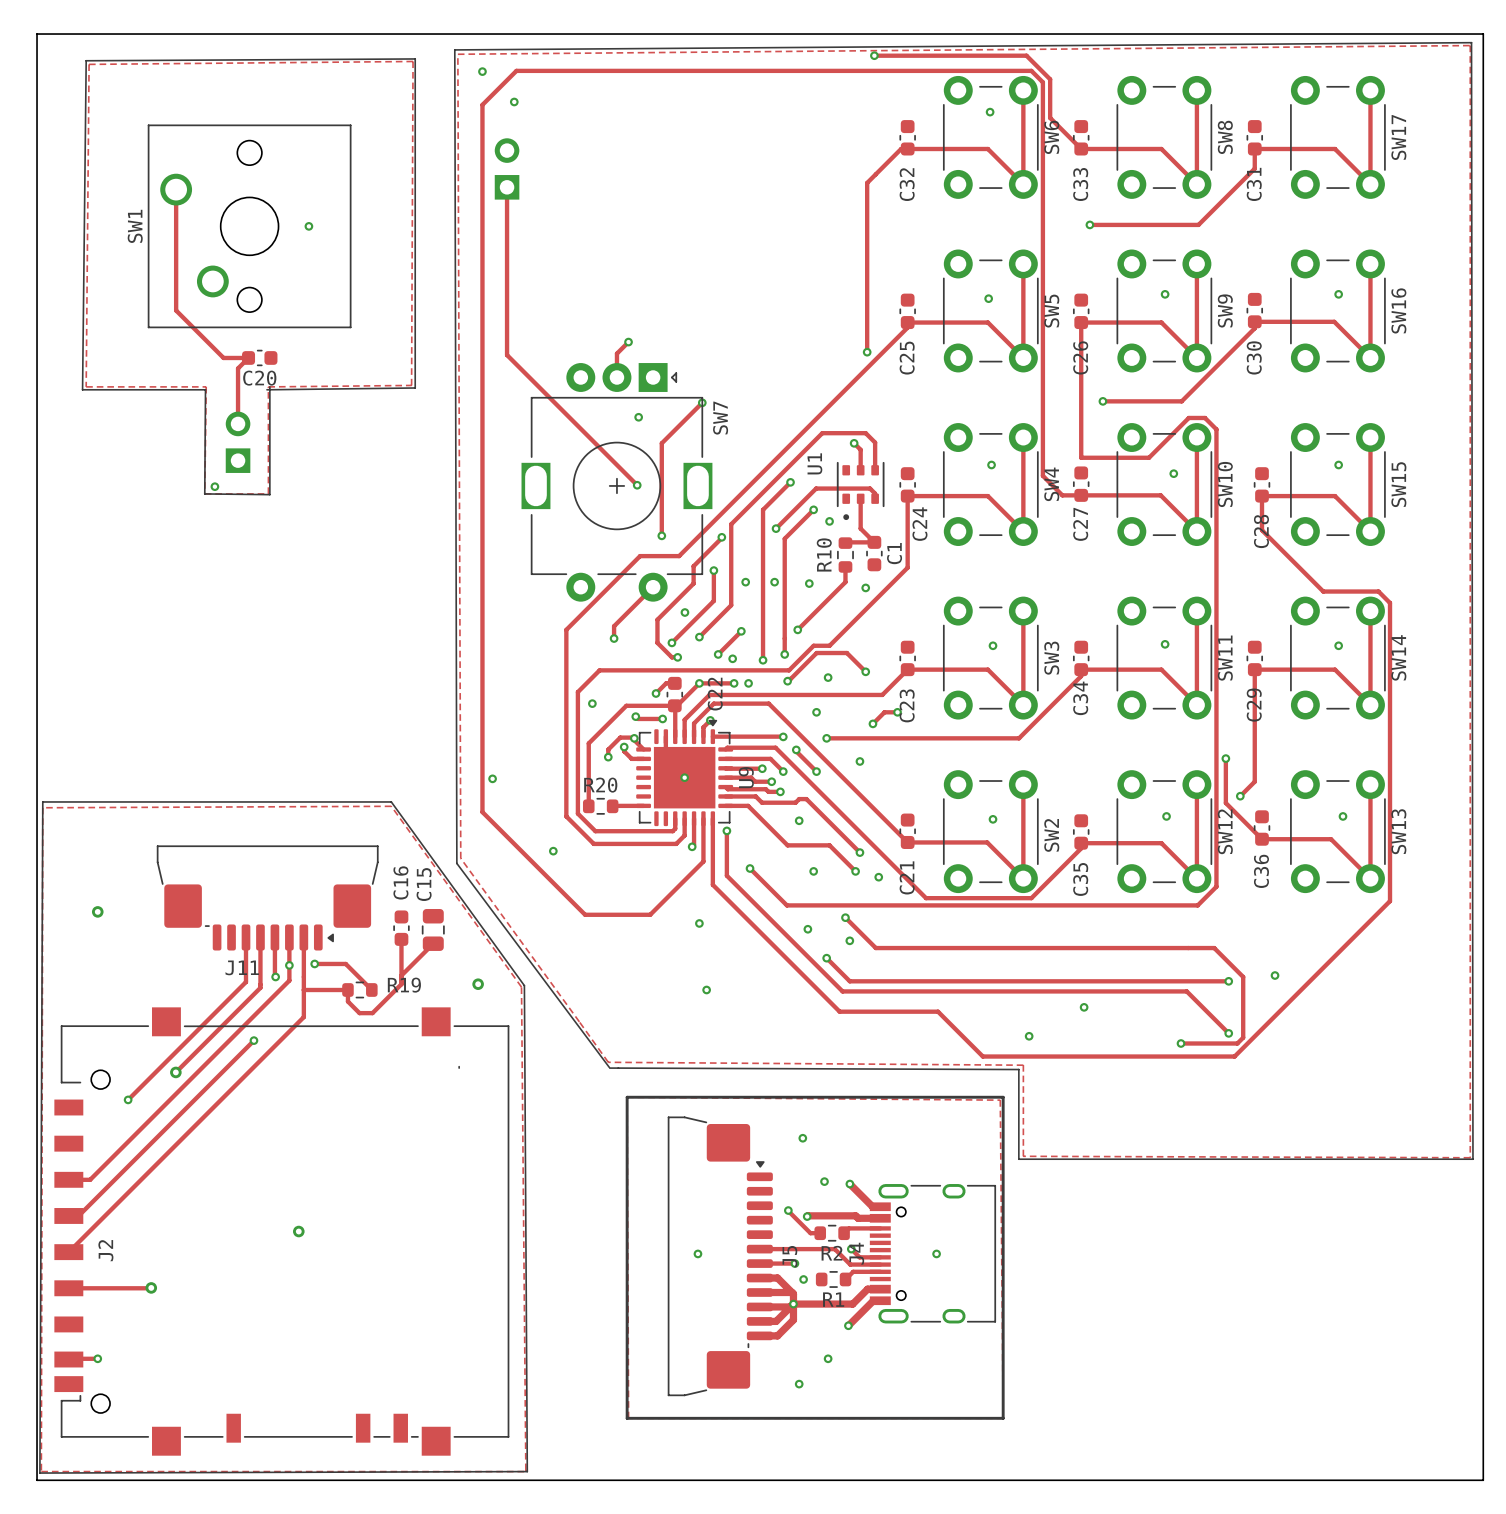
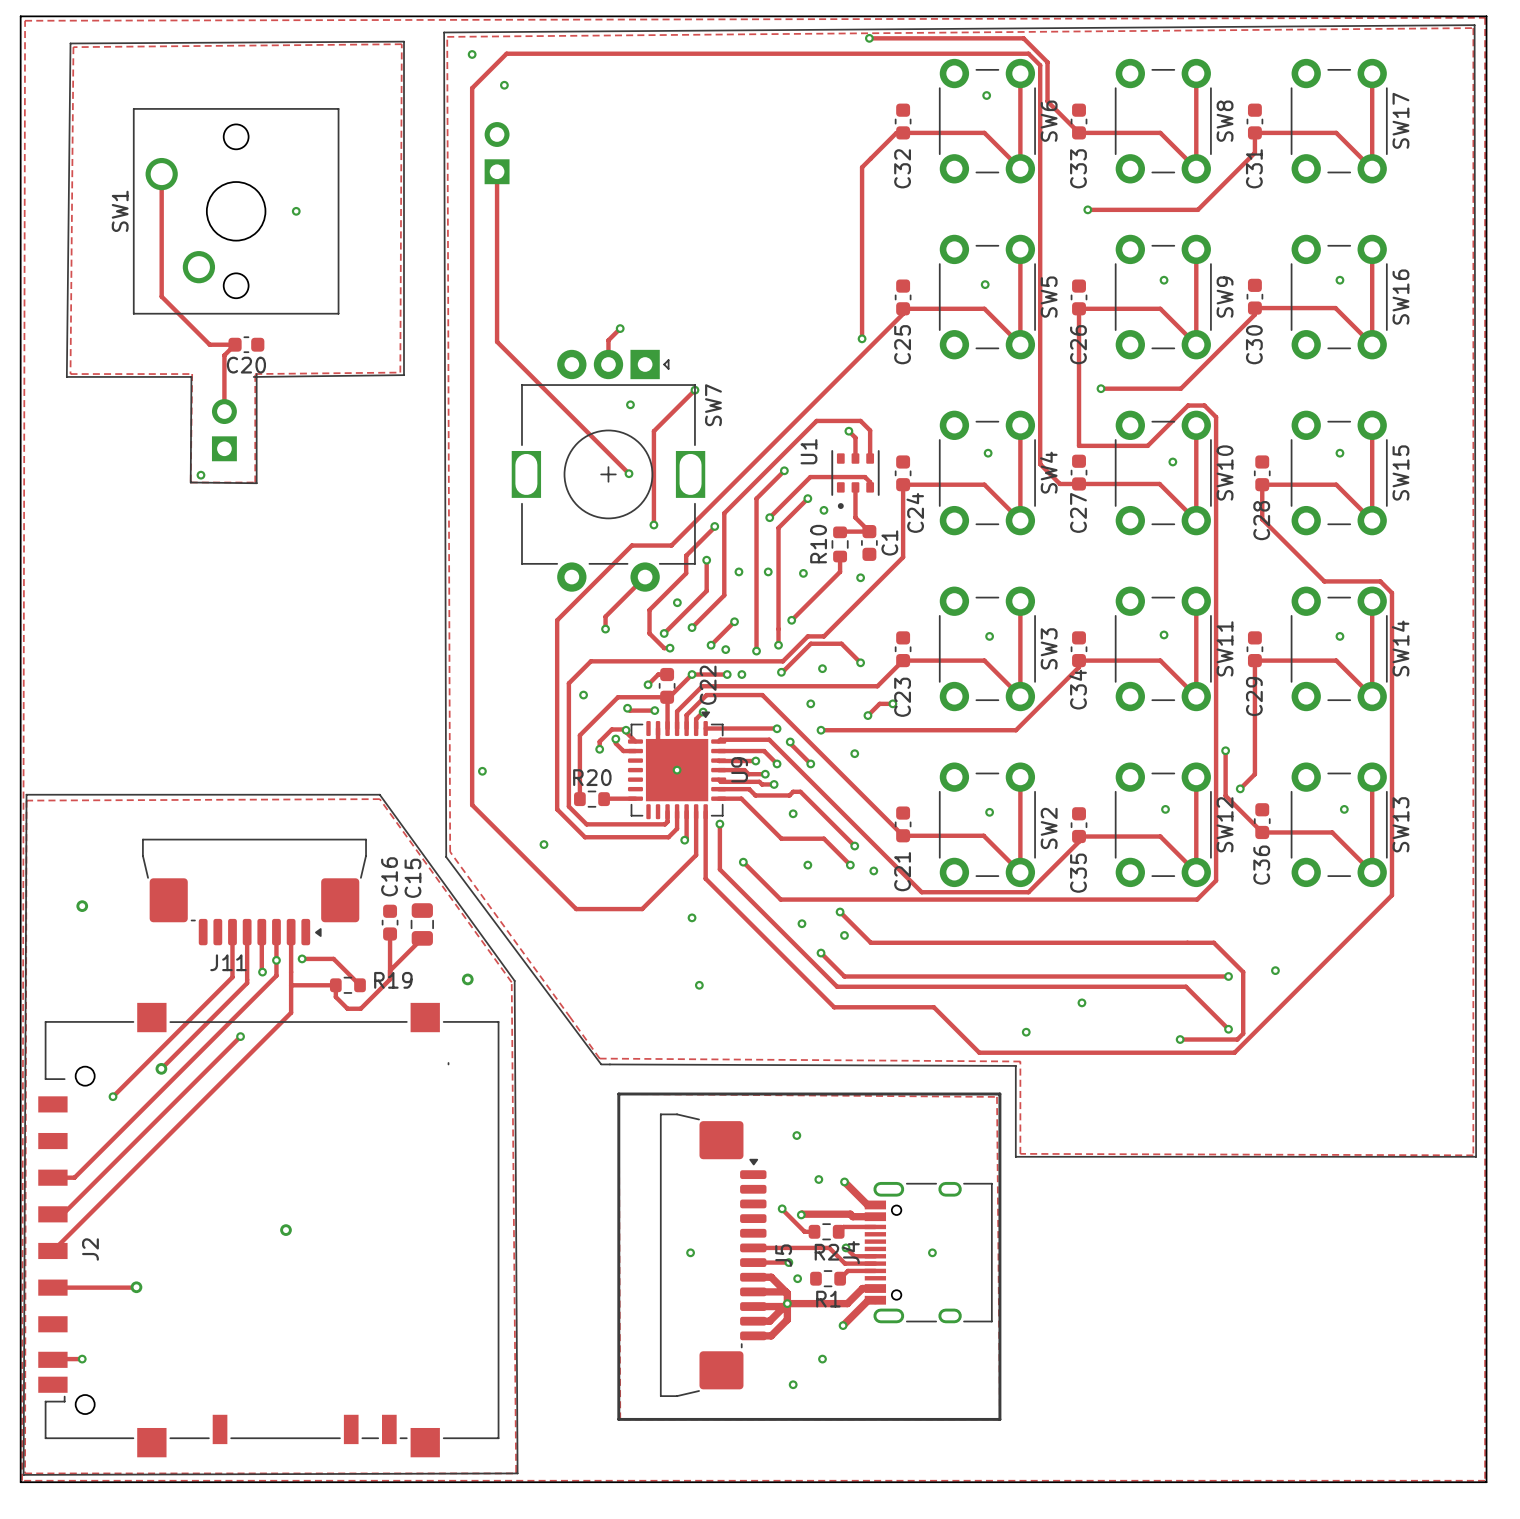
zone outline: none -> (1485, 17) (25, 20) (22, 1480) (1485, 1480) (1485, 17)

